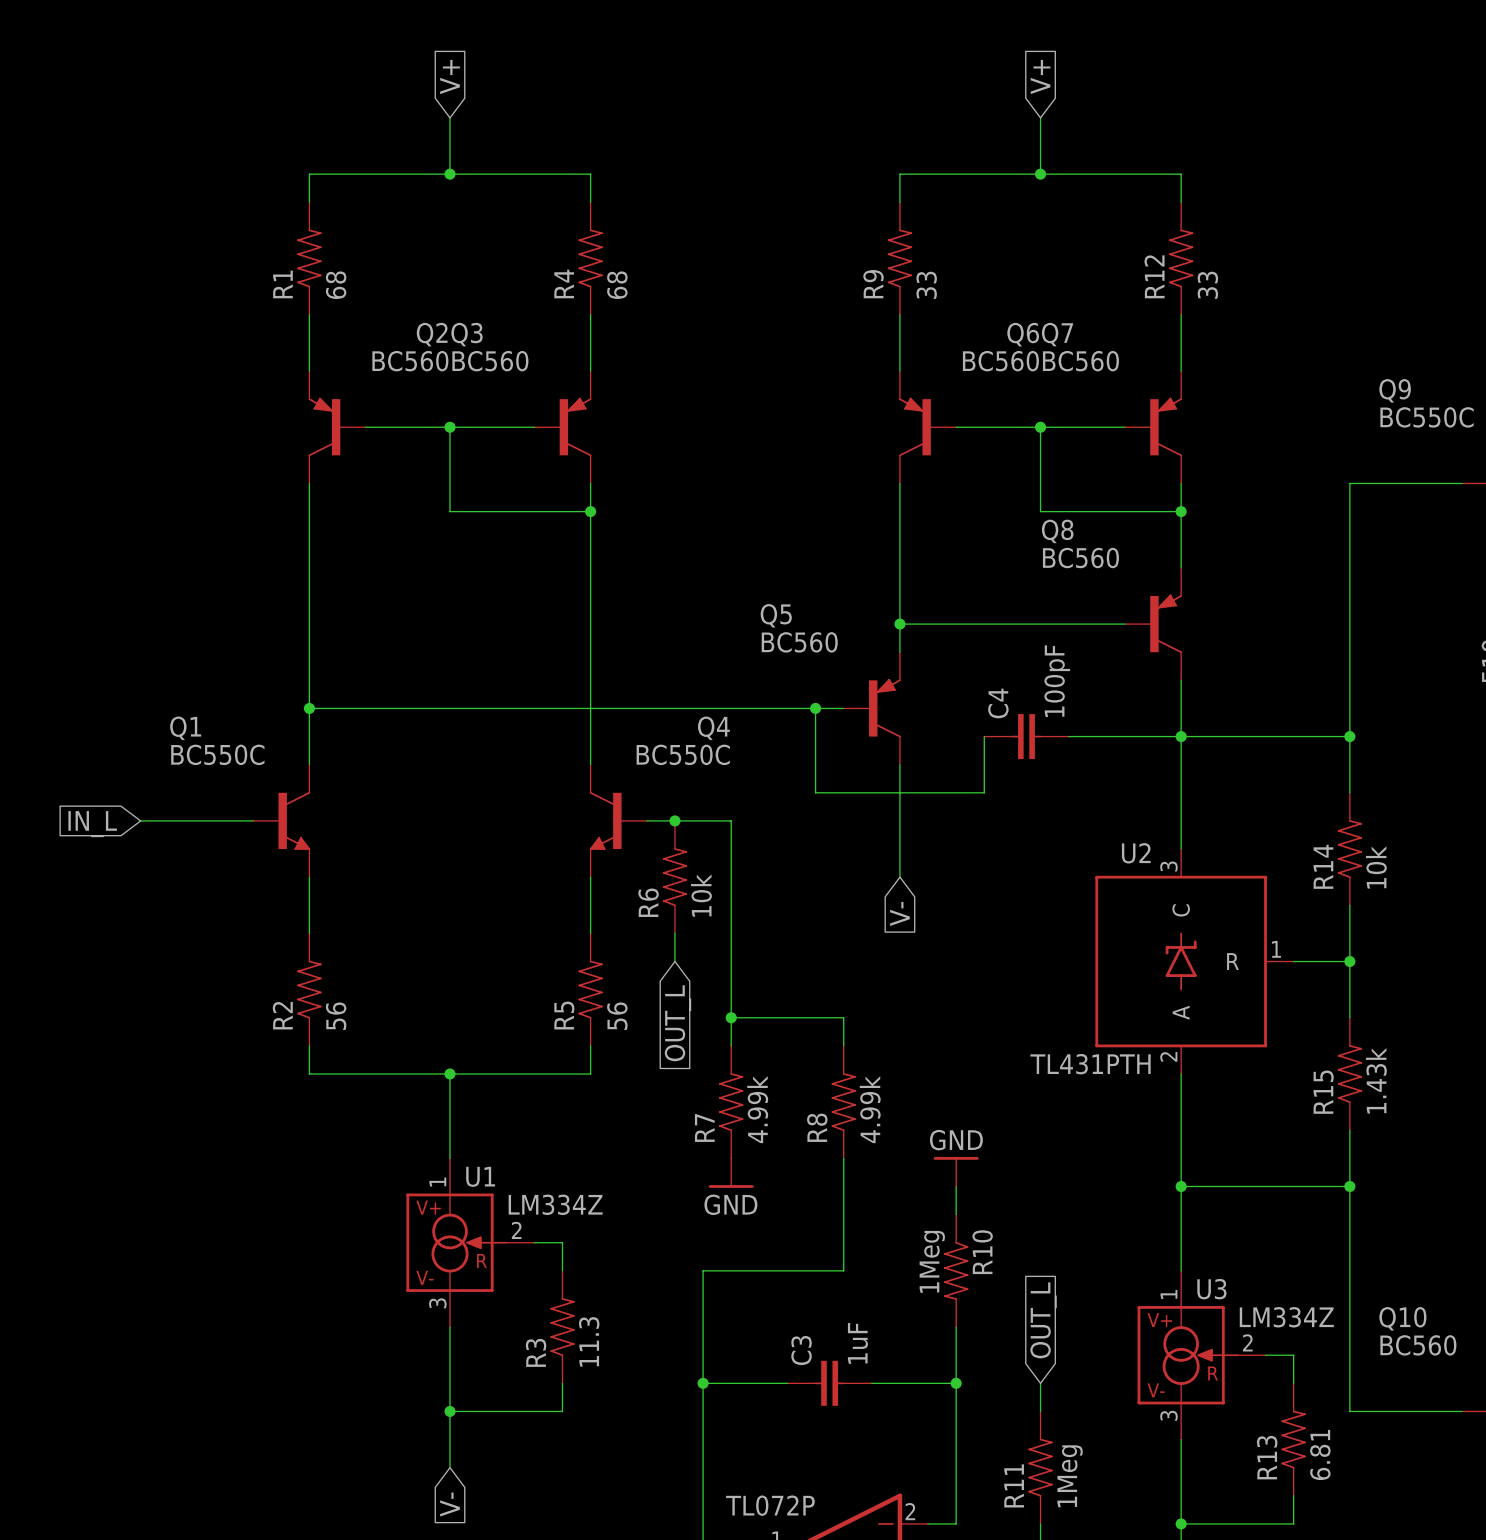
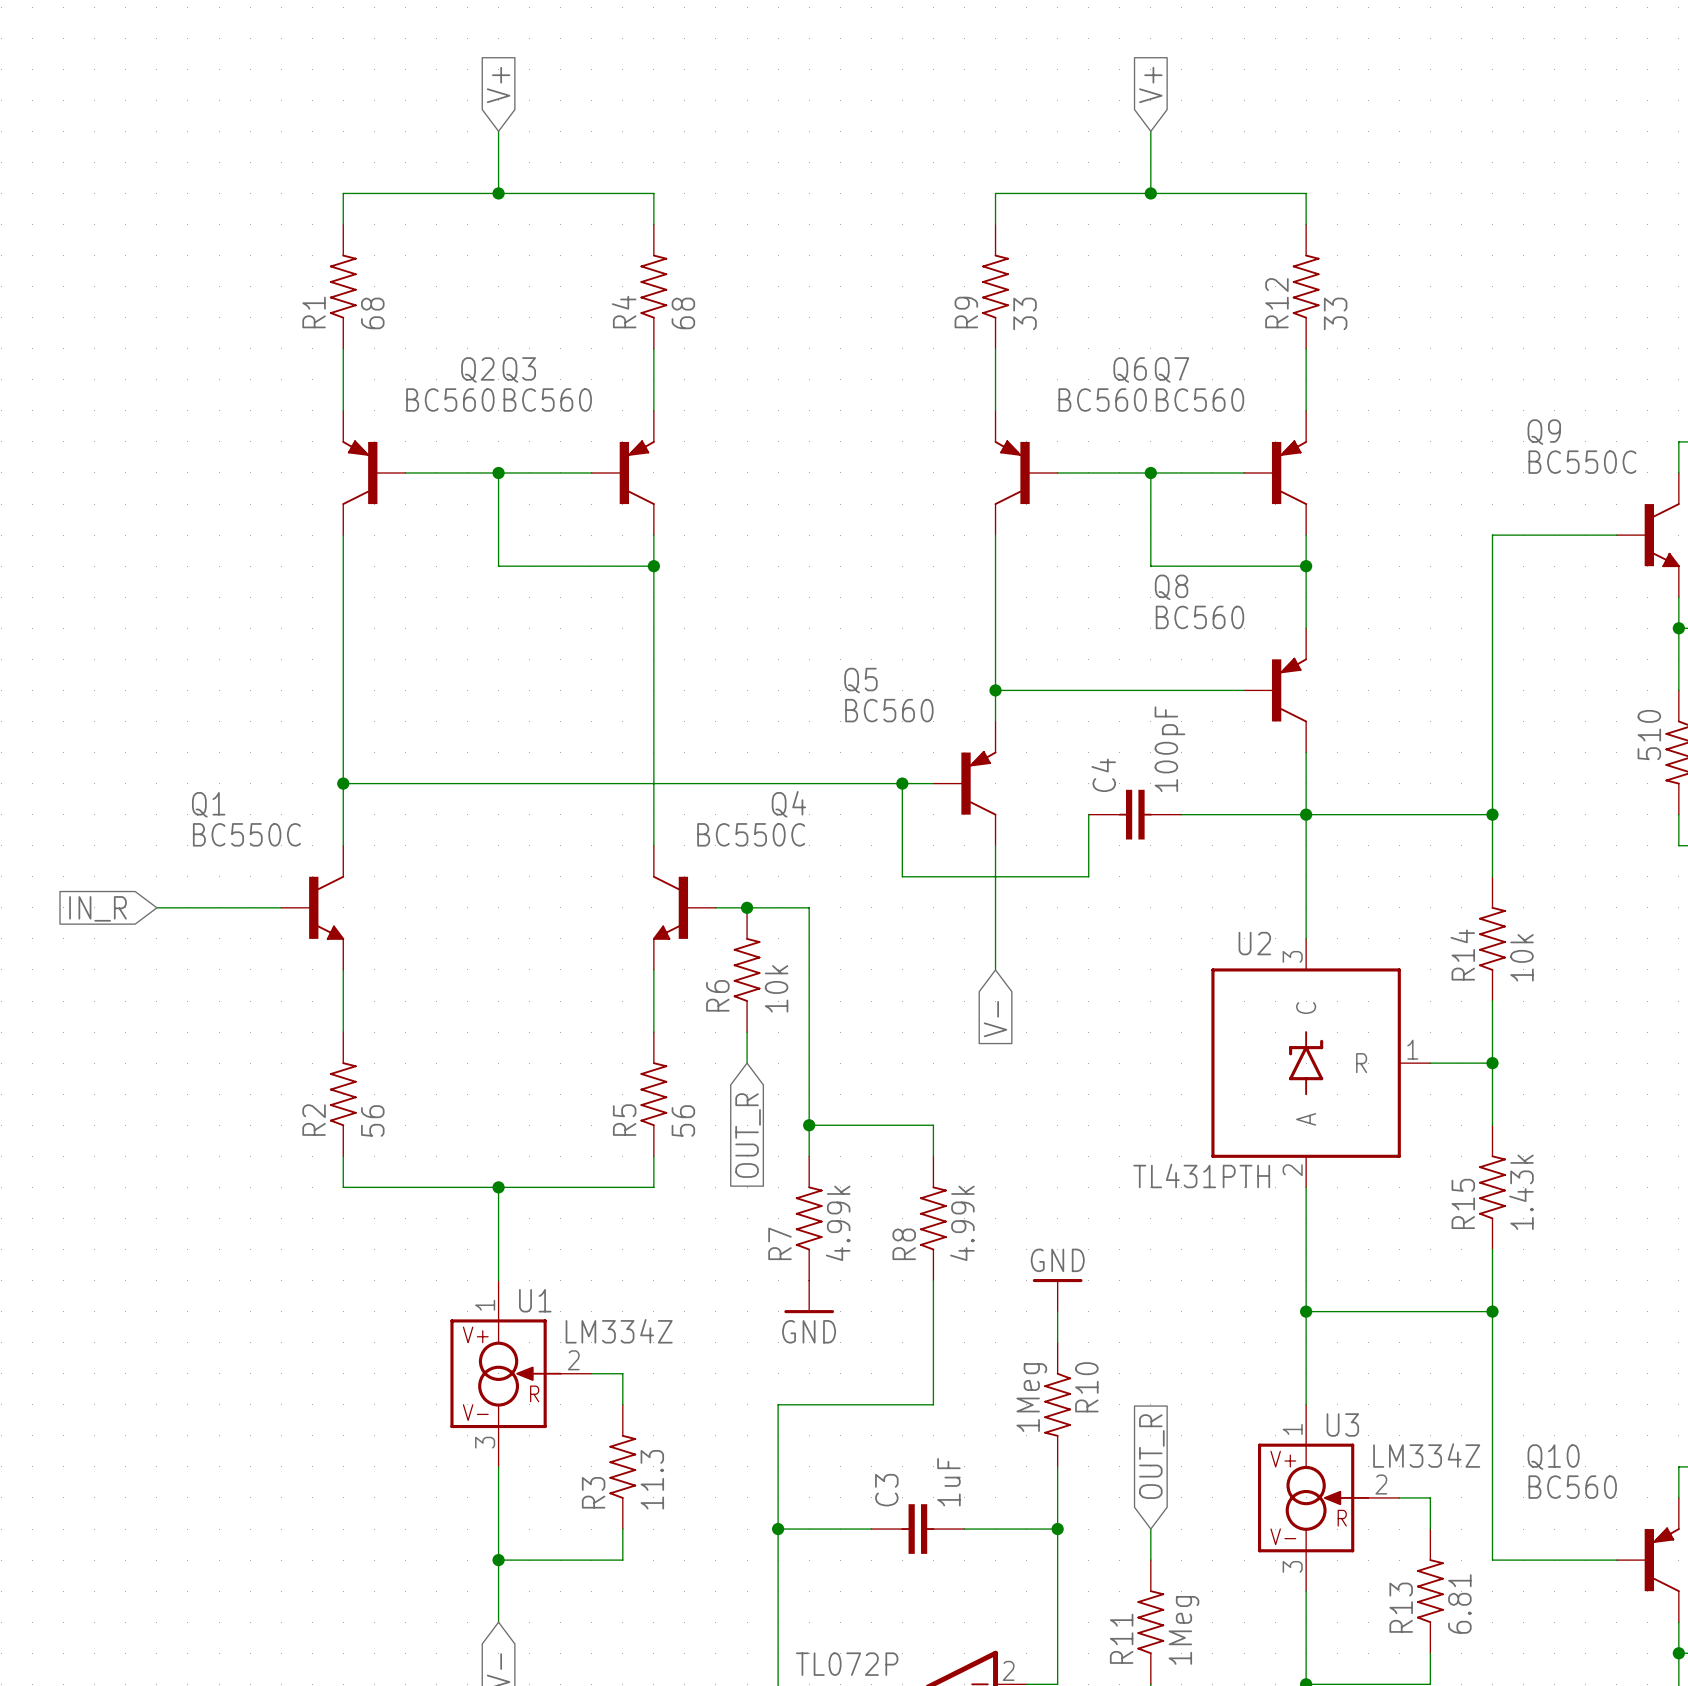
global label: IN_L (92, 824) -> IN_R (98, 908)
global label: OUT_L (677, 1023) -> OUT_R (748, 1135)
global label: OUT_L (1043, 1320) -> OUT_R (1151, 1456)

